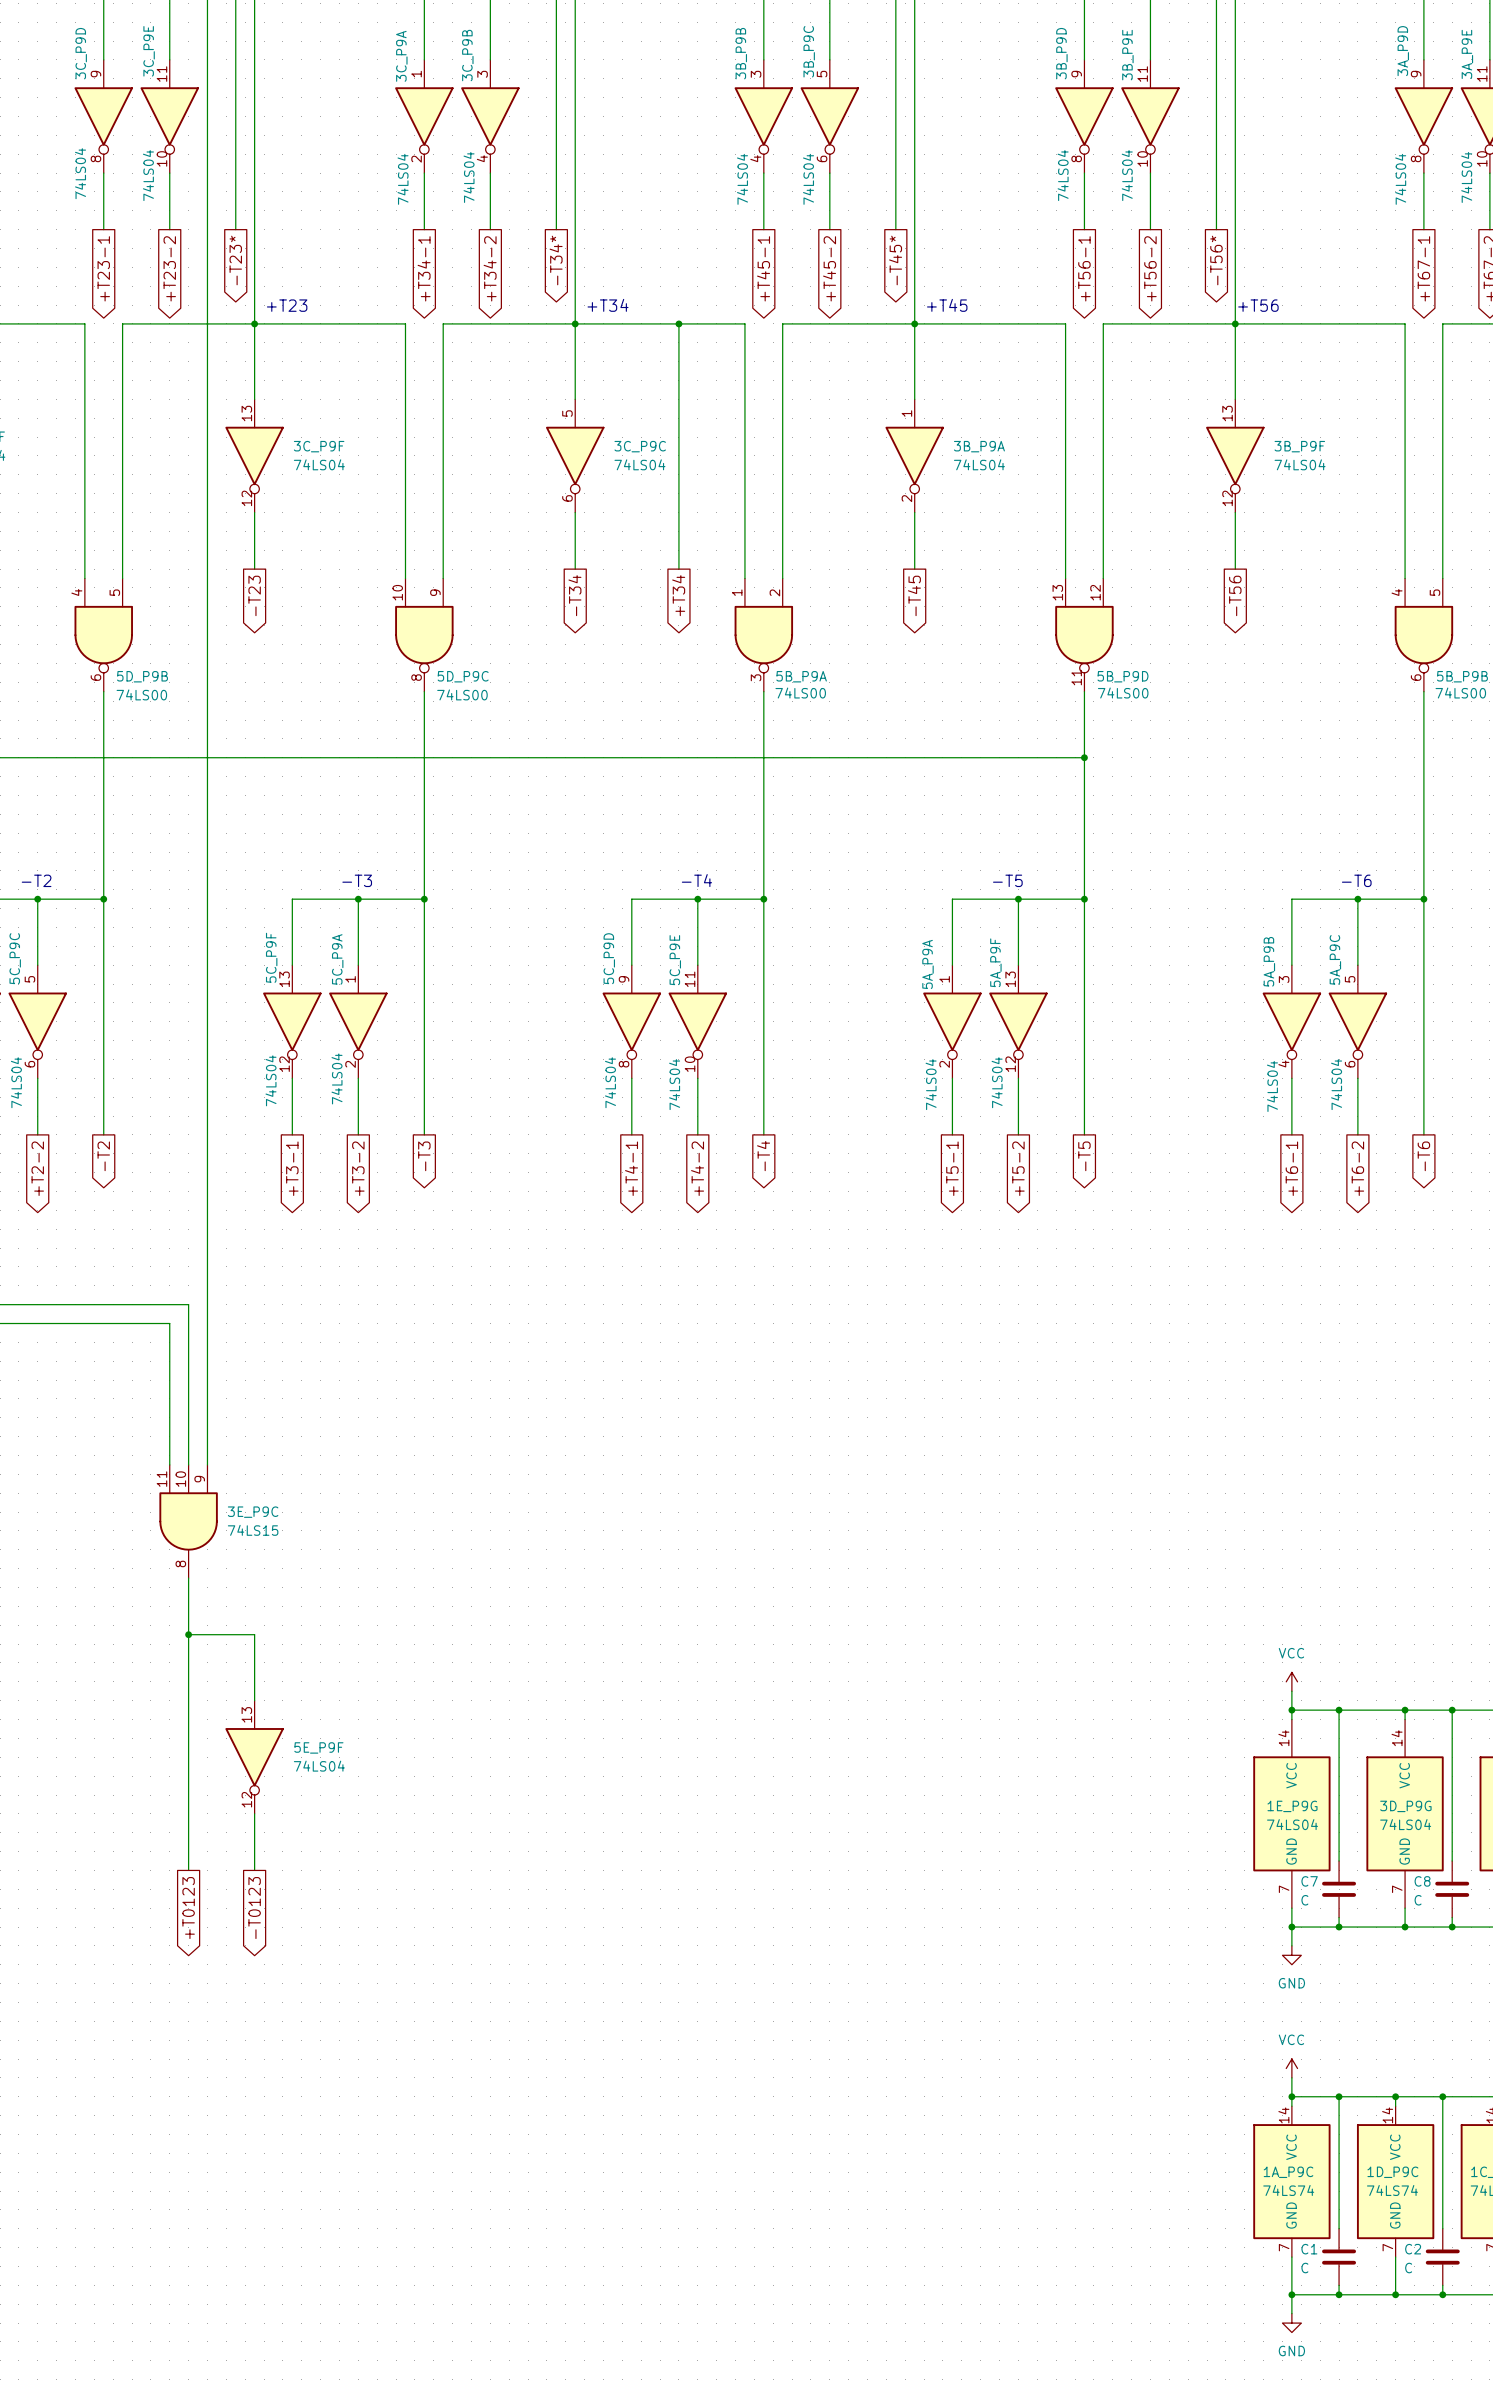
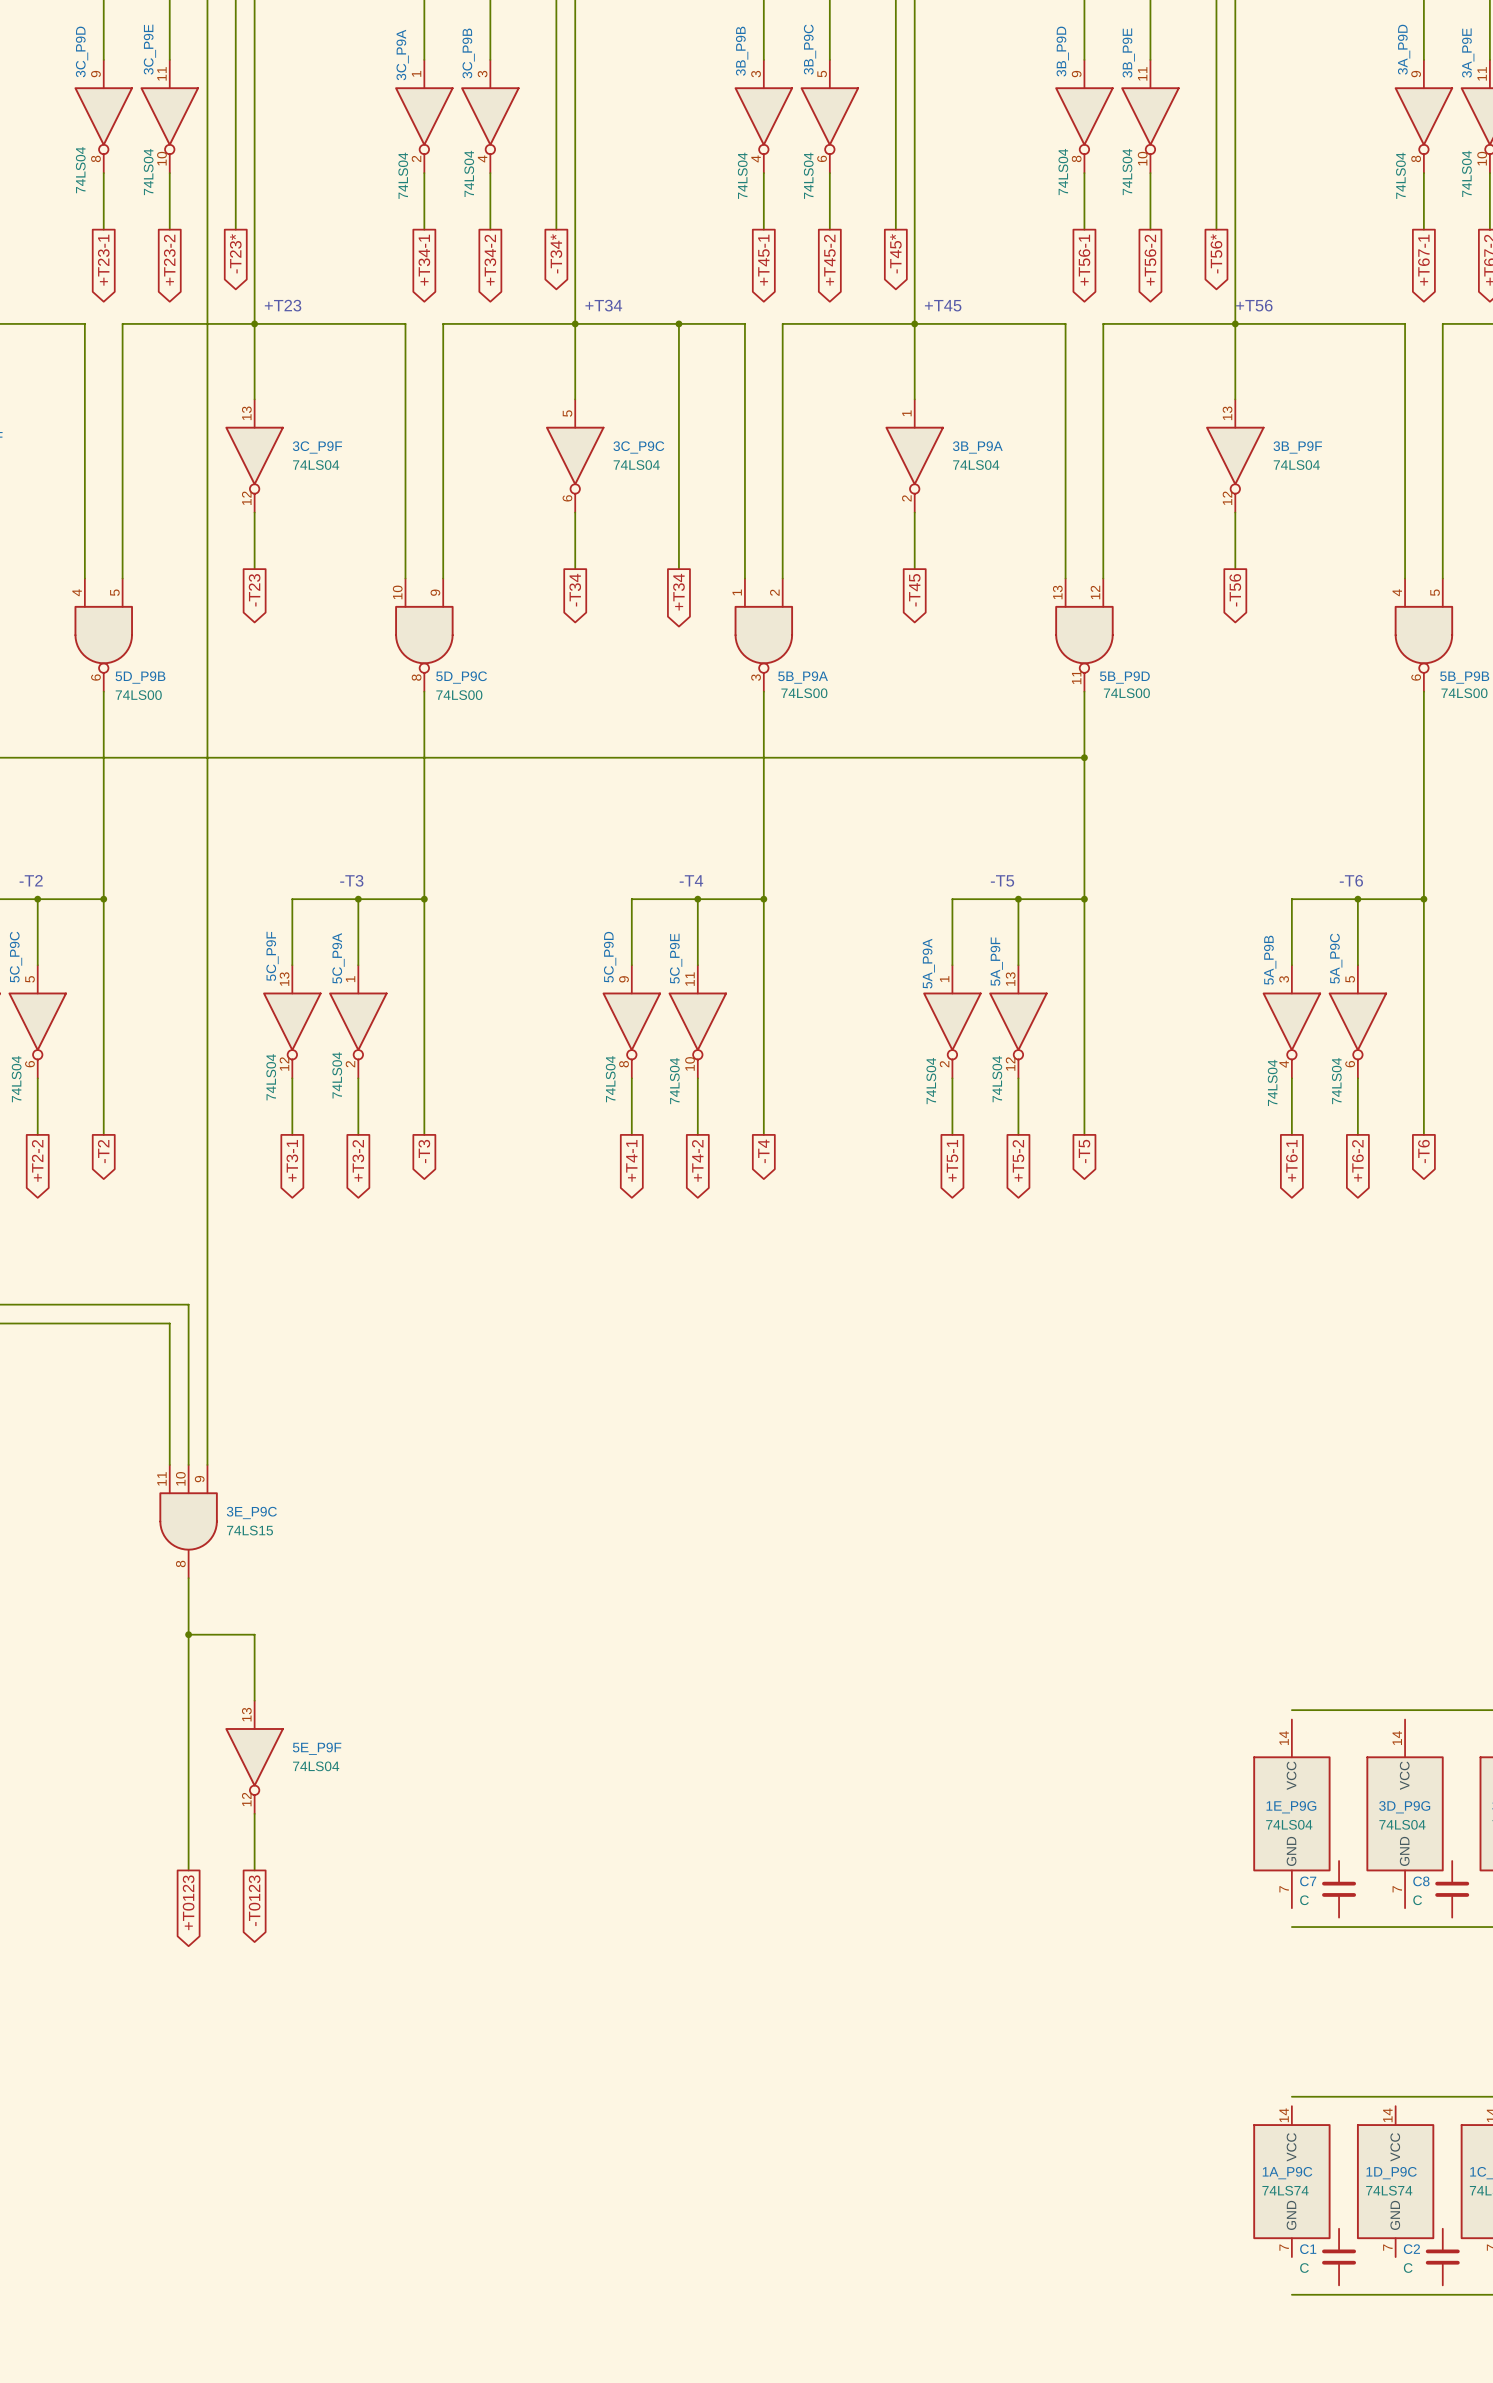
power symbol: VCC (1291, 1681) -> none
wire: (1291, 1691) (1291, 1719) -> none
junction: (1291, 1710) -> none
wire: (1339, 1710) (1339, 1861) -> none
junction: (1339, 1710) -> none
wire: (1405, 1710) (1405, 1719) -> none
junction: (1405, 1710) -> none
wire: (1452, 1710) (1452, 1861) -> none
junction: (1452, 1710) -> none
wire: (1291, 1908) (1291, 1945) -> none
wire: (1405, 1908) (1405, 1927) -> none
wire: (1339, 1917) (1339, 1927) -> none
wire: (1452, 1917) (1452, 1927) -> none
junction: (1291, 1927) -> none
junction: (1339, 1927) -> none
junction: (1405, 1927) -> none
junction: (1452, 1927) -> none
power symbol: GND (1291, 1955) -> none
power symbol: VCC (1291, 2068) -> none
wire: (1291, 2077) (1291, 2106) -> none
junction: (1291, 2096) -> none
wire: (1339, 2096) (1339, 2228) -> none
junction: (1339, 2096) -> none
wire: (1395, 2096) (1395, 2106) -> none
junction: (1395, 2096) -> none
wire: (1442, 2096) (1442, 2228) -> none
junction: (1442, 2096) -> none
wire: (1291, 2257) (1291, 2313) -> none
wire: (1395, 2257) (1395, 2294) -> none
wire: (1339, 2285) (1339, 2294) -> none
wire: (1442, 2285) (1442, 2294) -> none
junction: (1291, 2294) -> none
junction: (1339, 2294) -> none
junction: (1395, 2294) -> none
junction: (1442, 2294) -> none
power symbol: GND (1291, 2323) -> none

